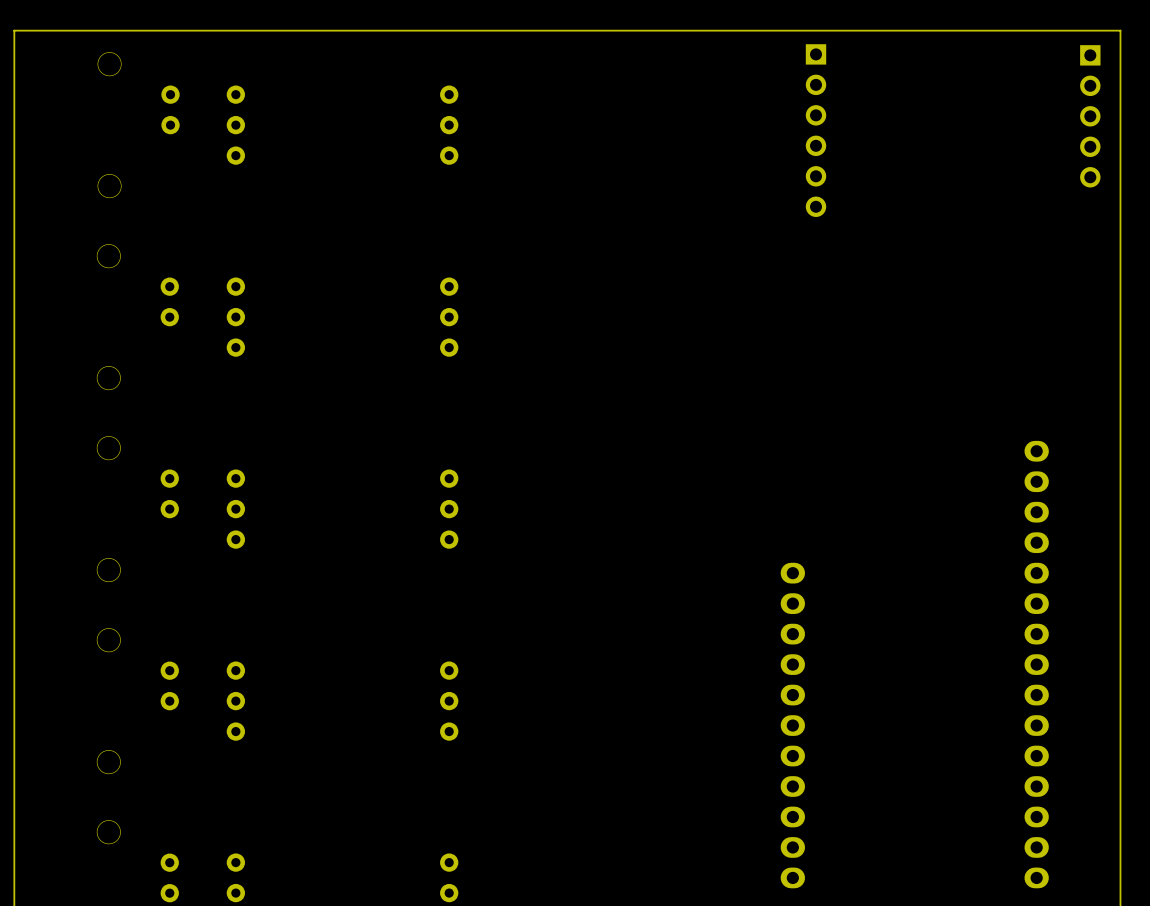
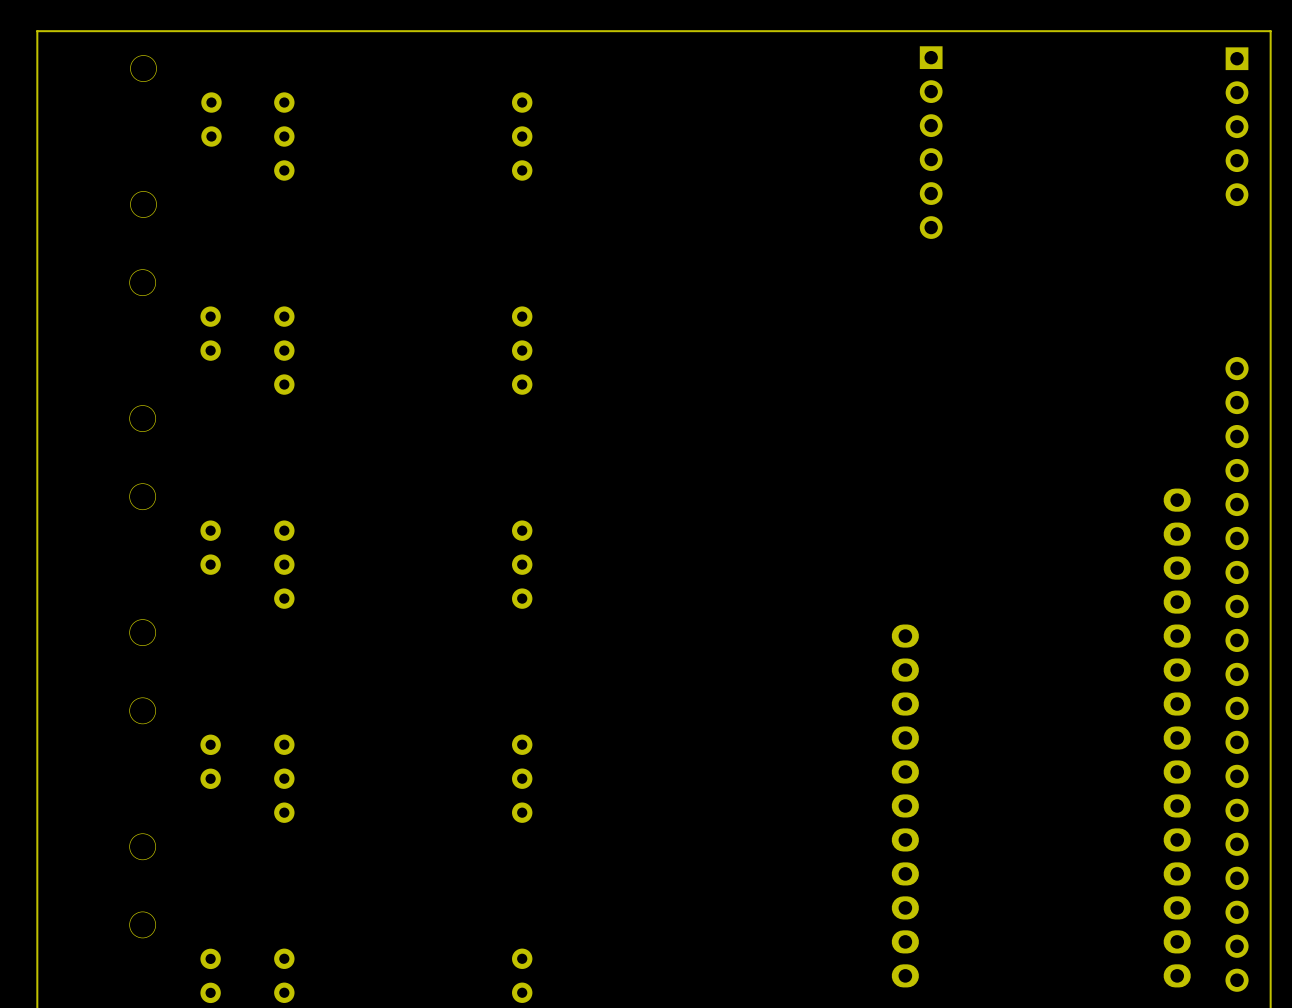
part: none -> (1237, 674)

